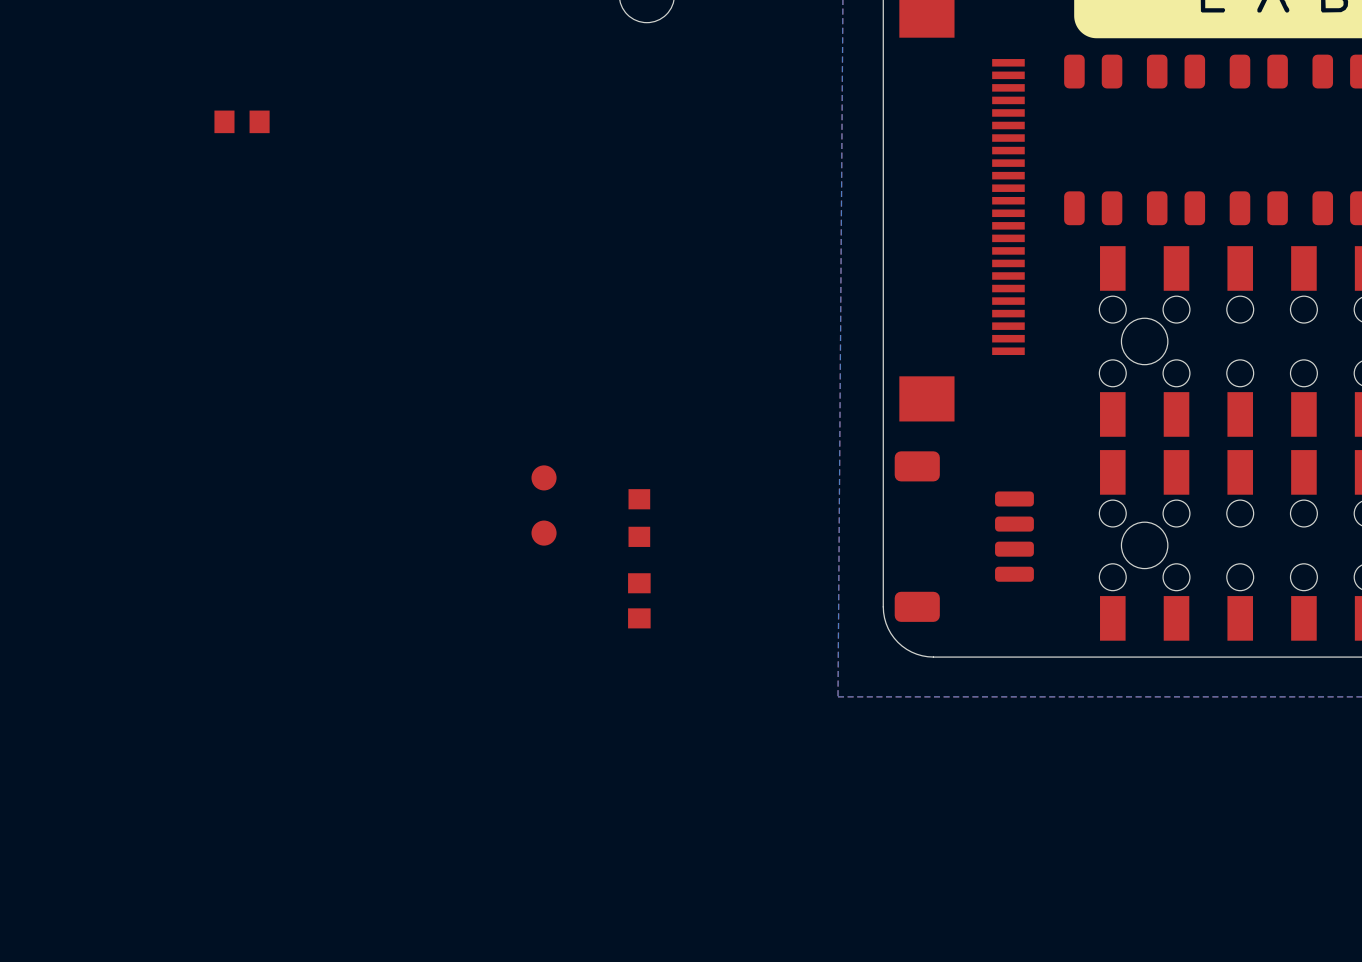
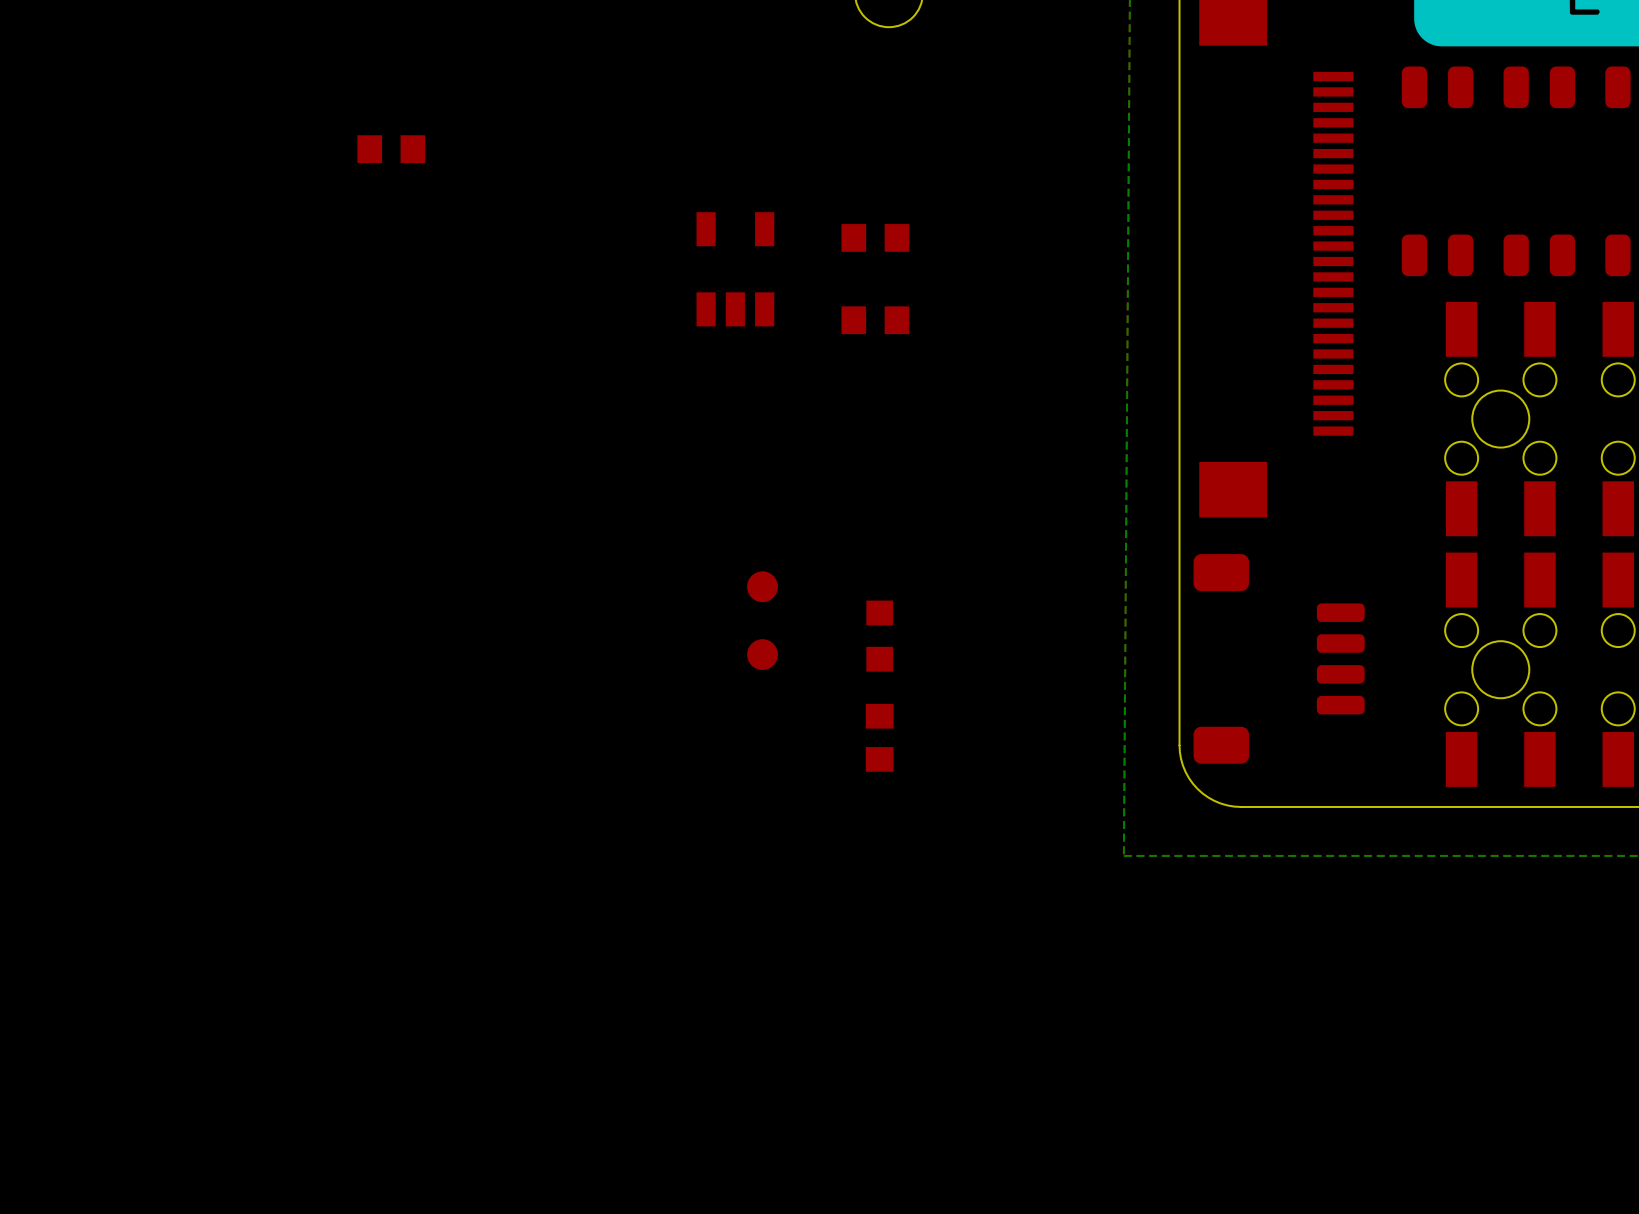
part: none -> (875, 237)
part: none -> (735, 269)
part: none -> (875, 320)

